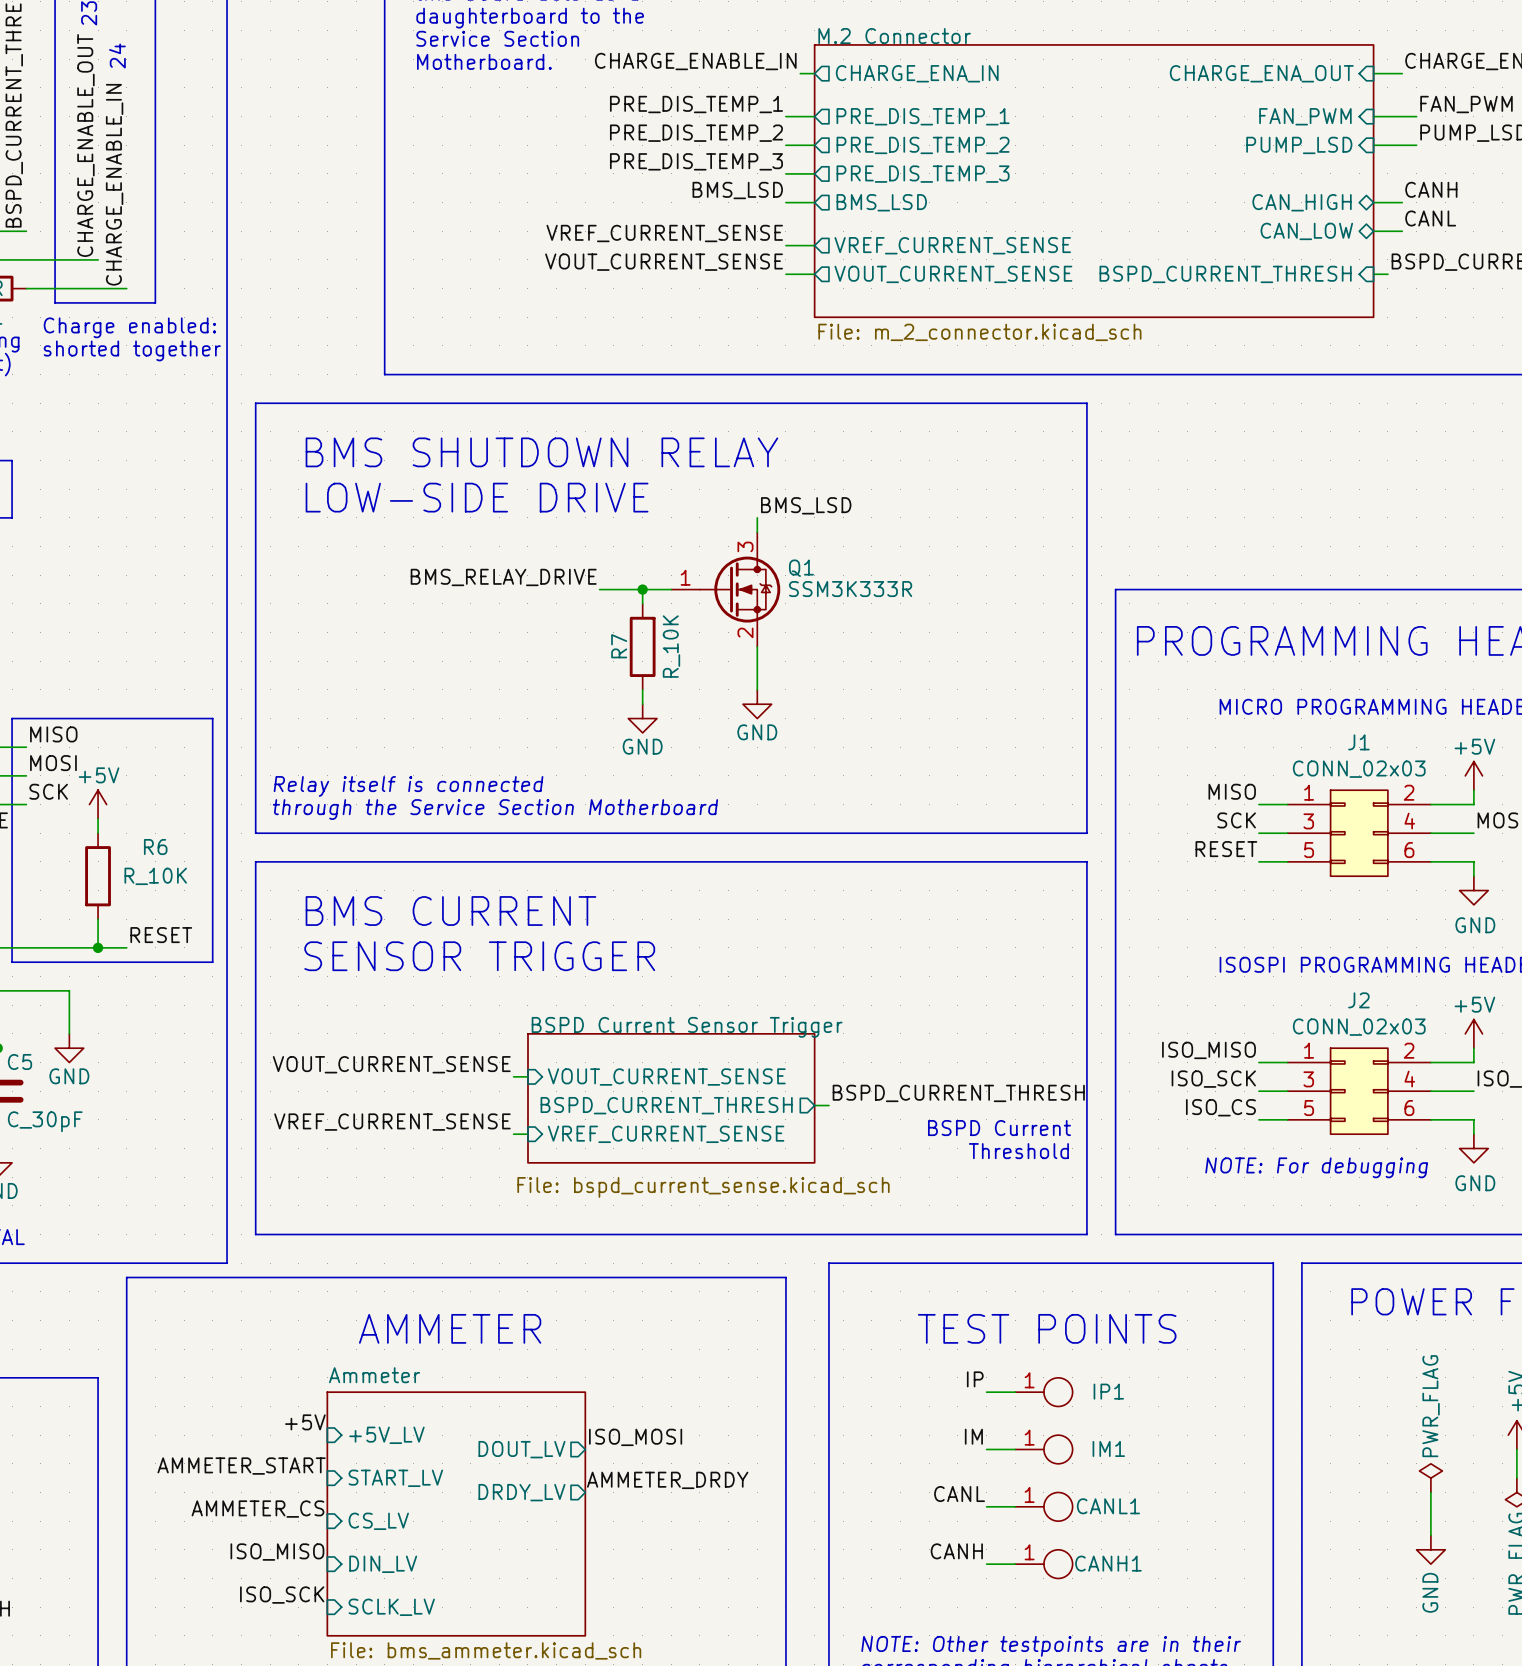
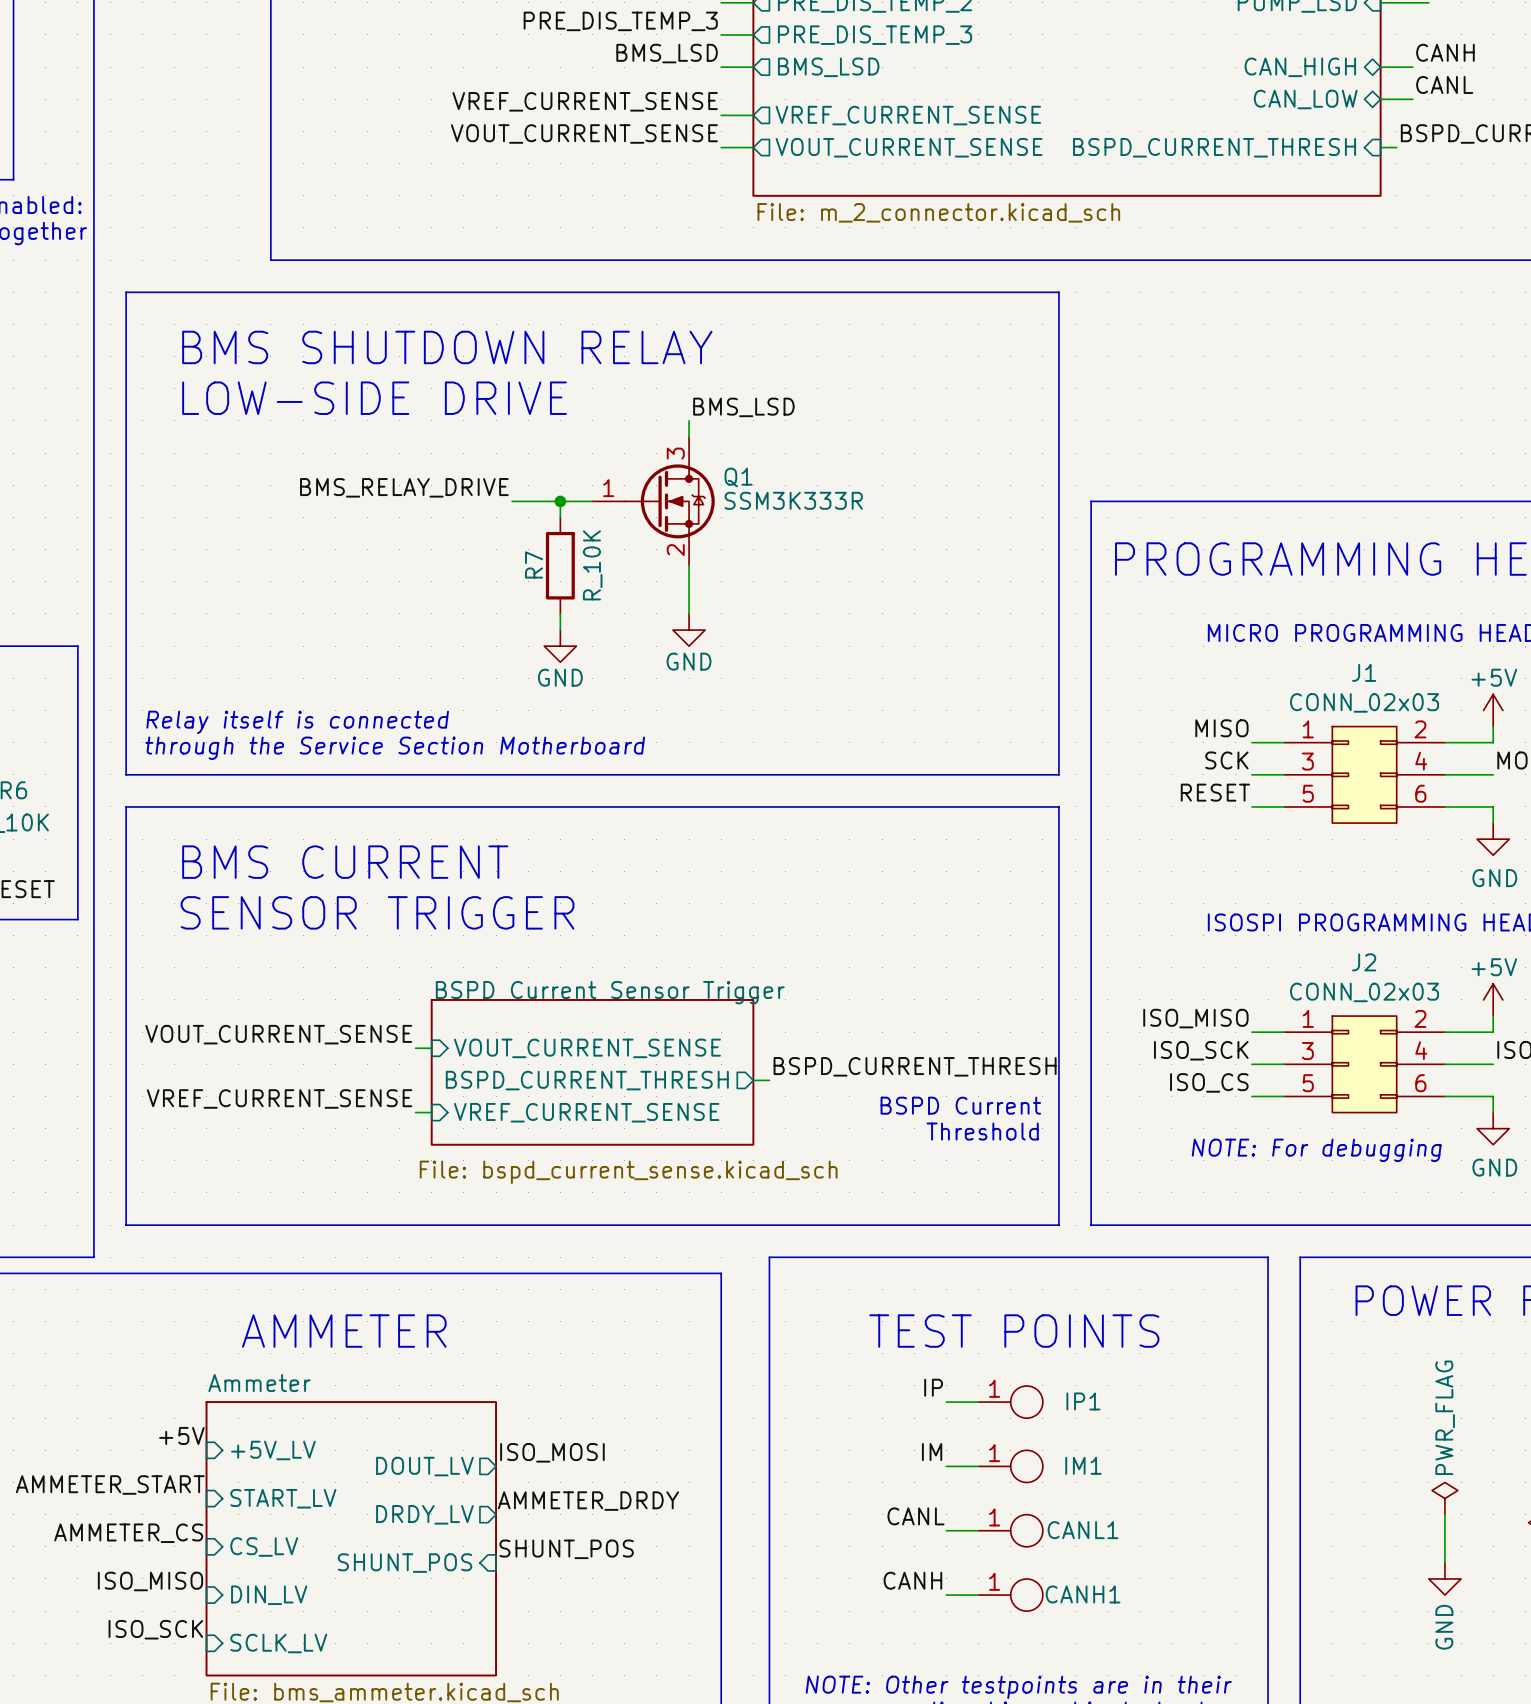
label: none -> SHUNT_POS (566, 1549)
sheet pin: none -> SHUNT_POS (405, 1563)

